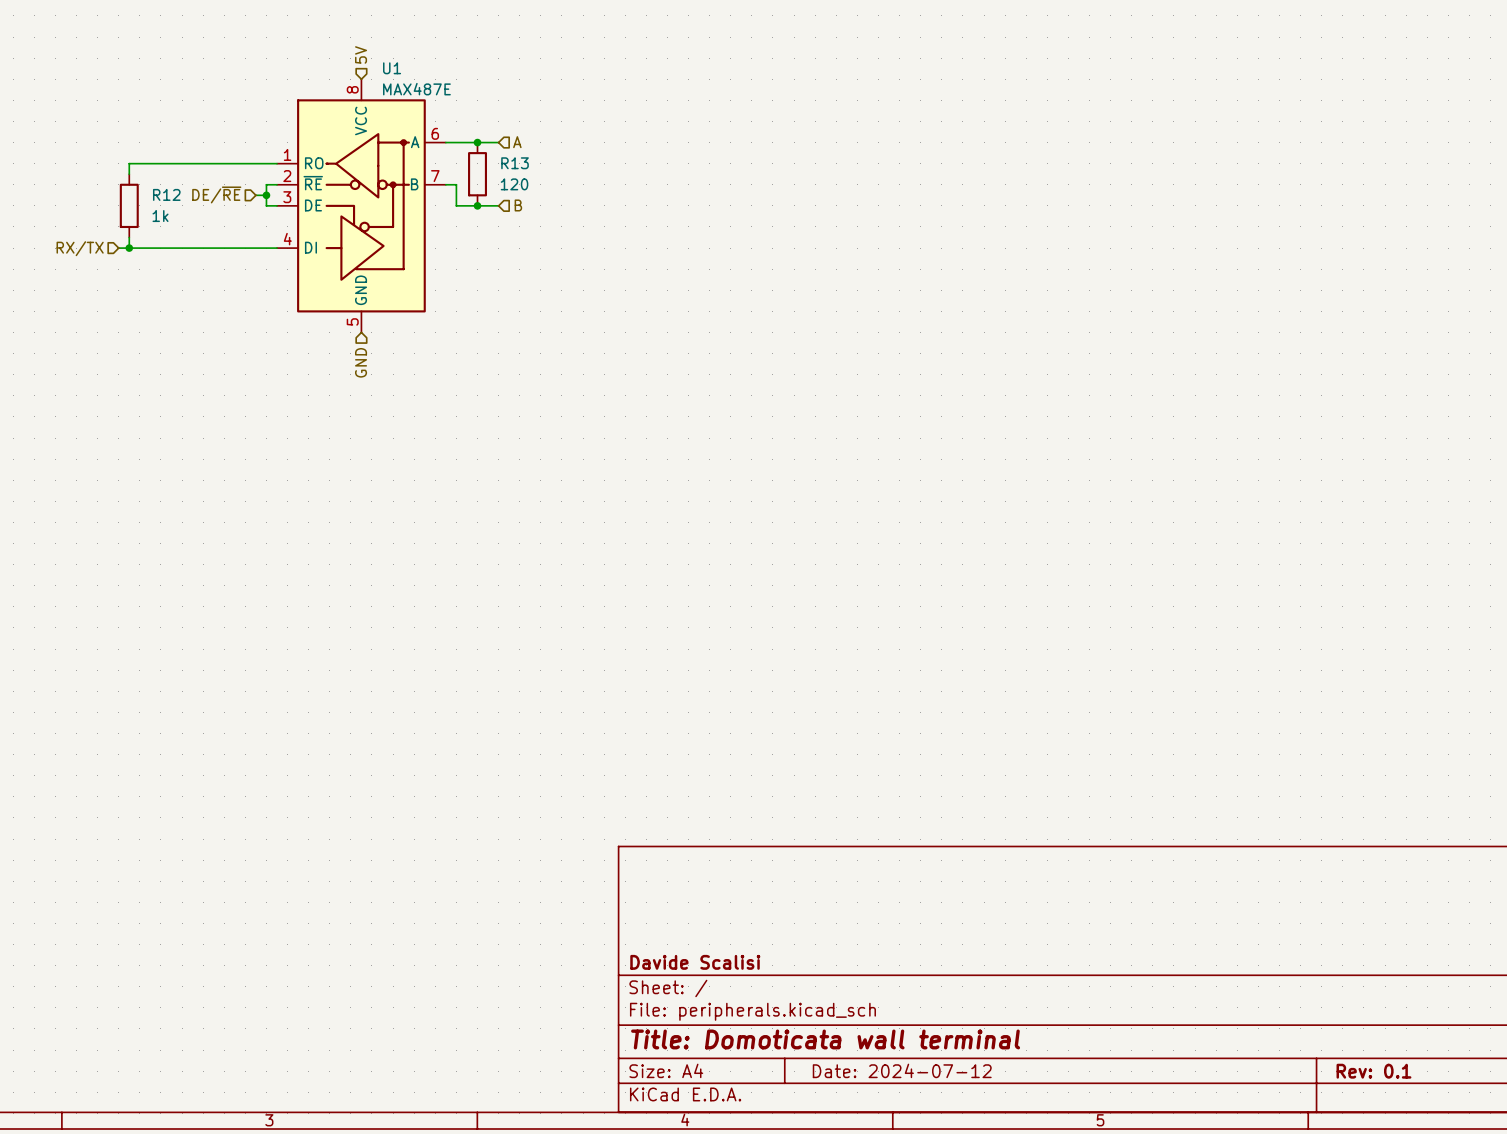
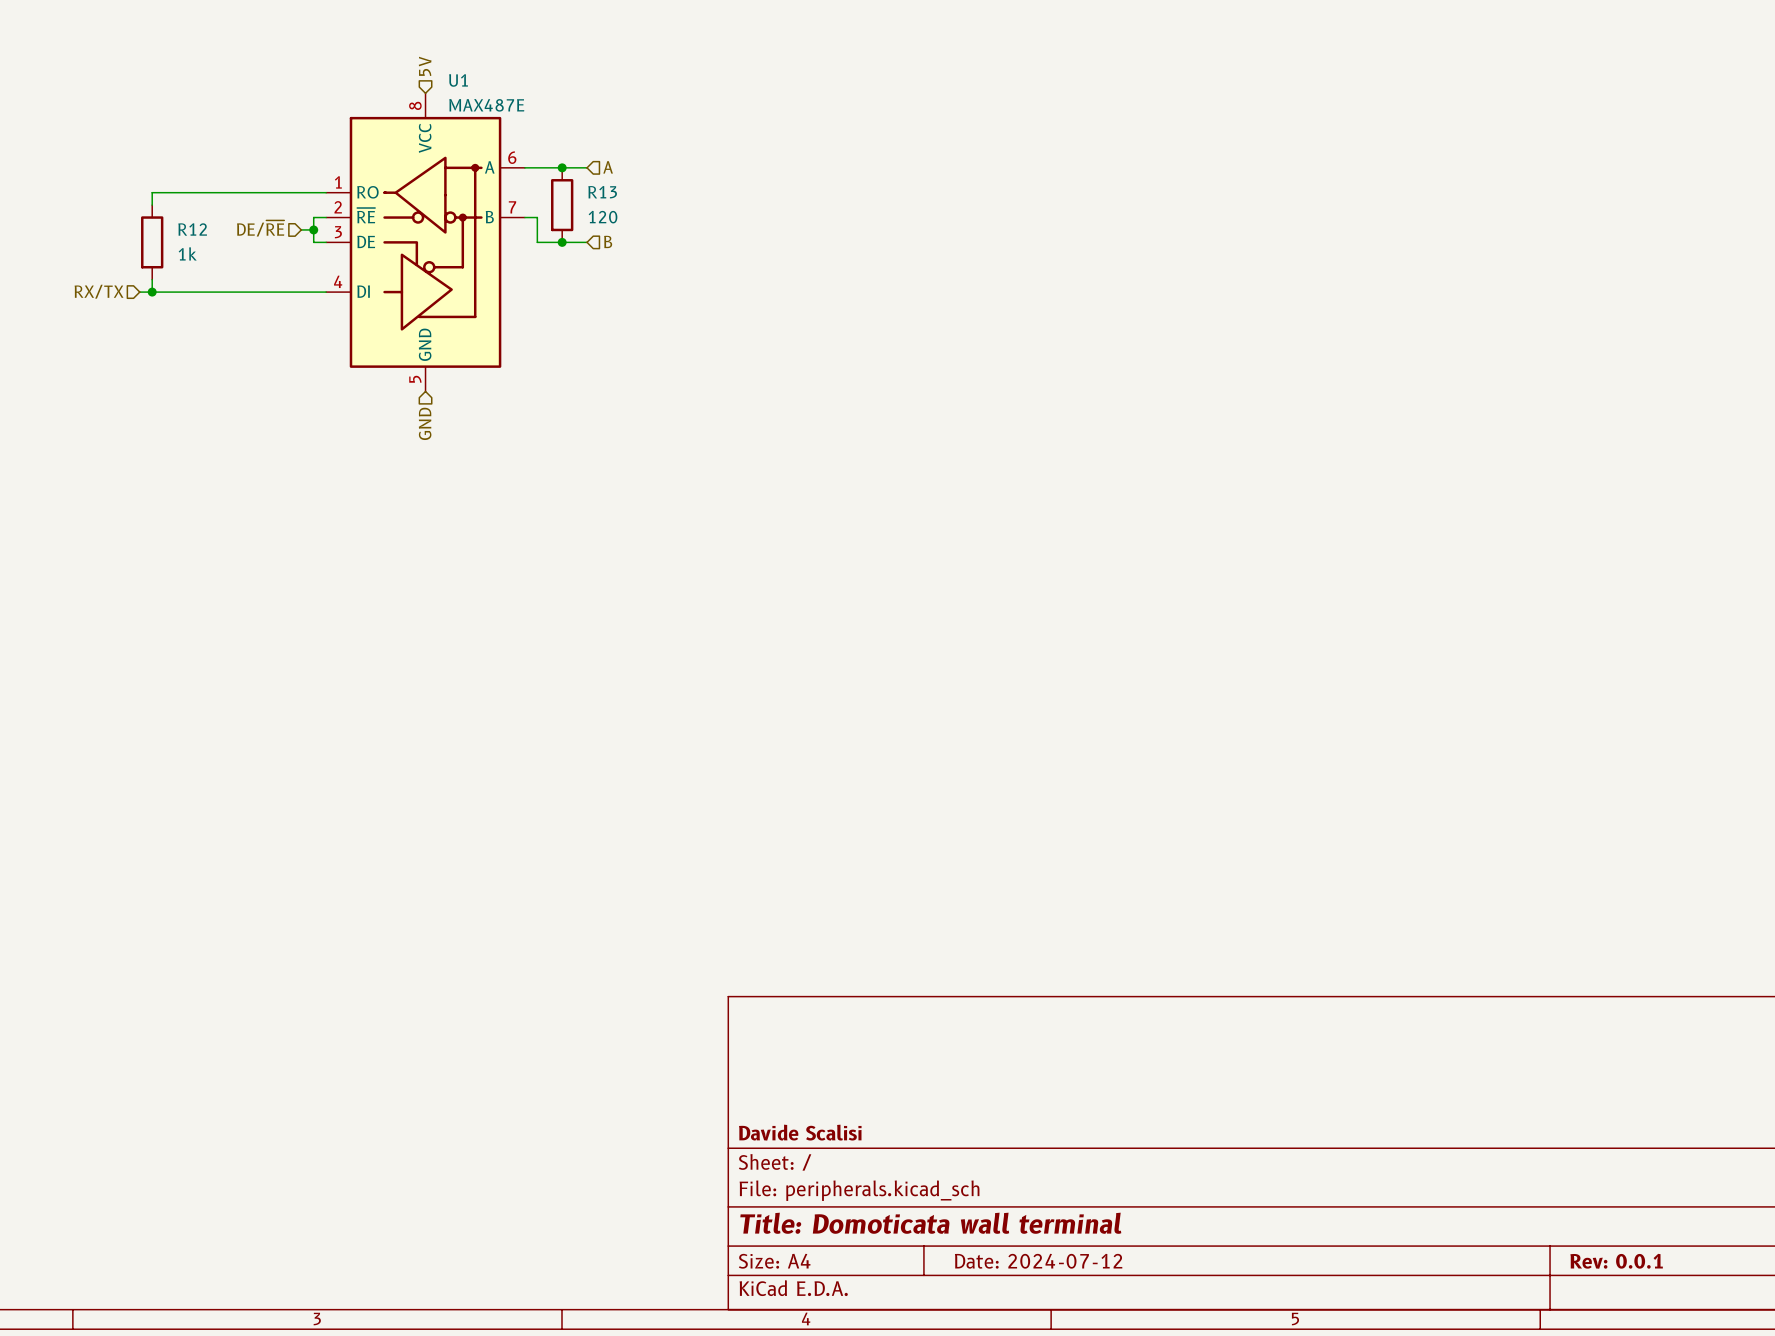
title block: Rev: 0.1 (1373, 1071) -> Rev: 0.0.1 (1616, 1261)

